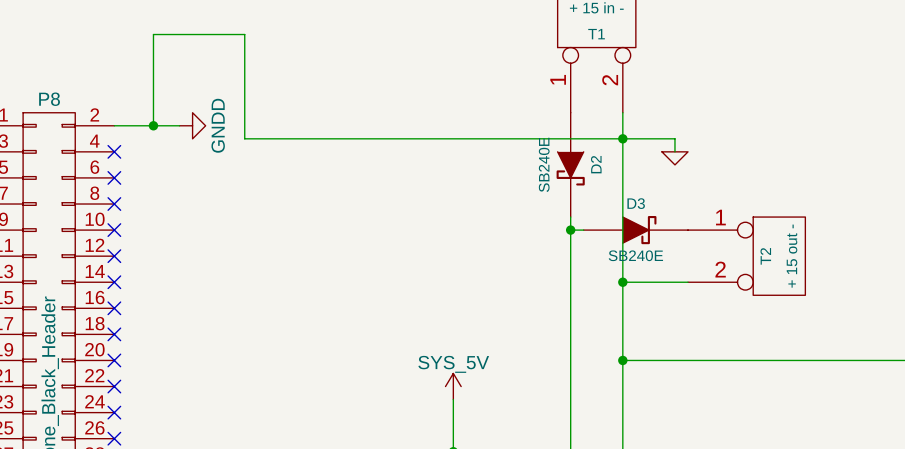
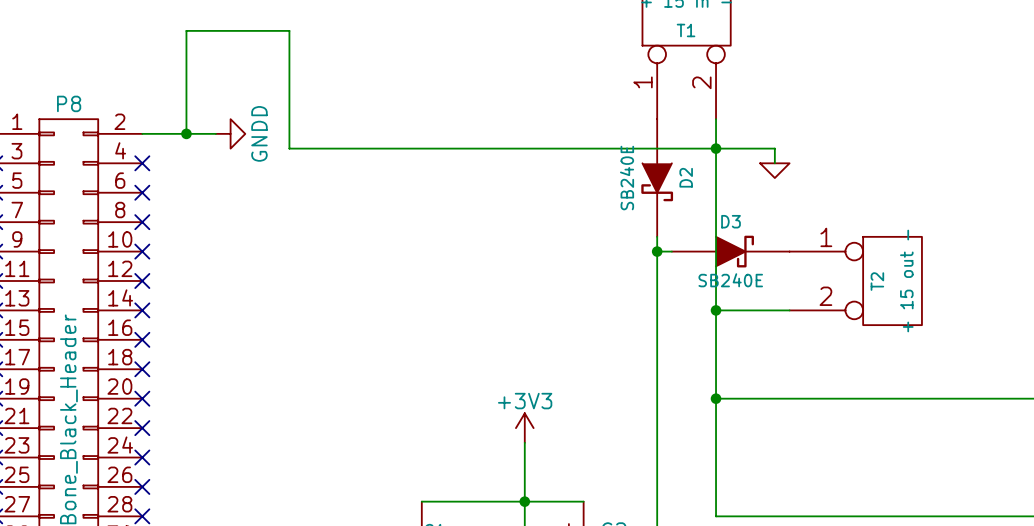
power symbol: SYS_5V (453, 386) -> +3V3 (524, 428)

